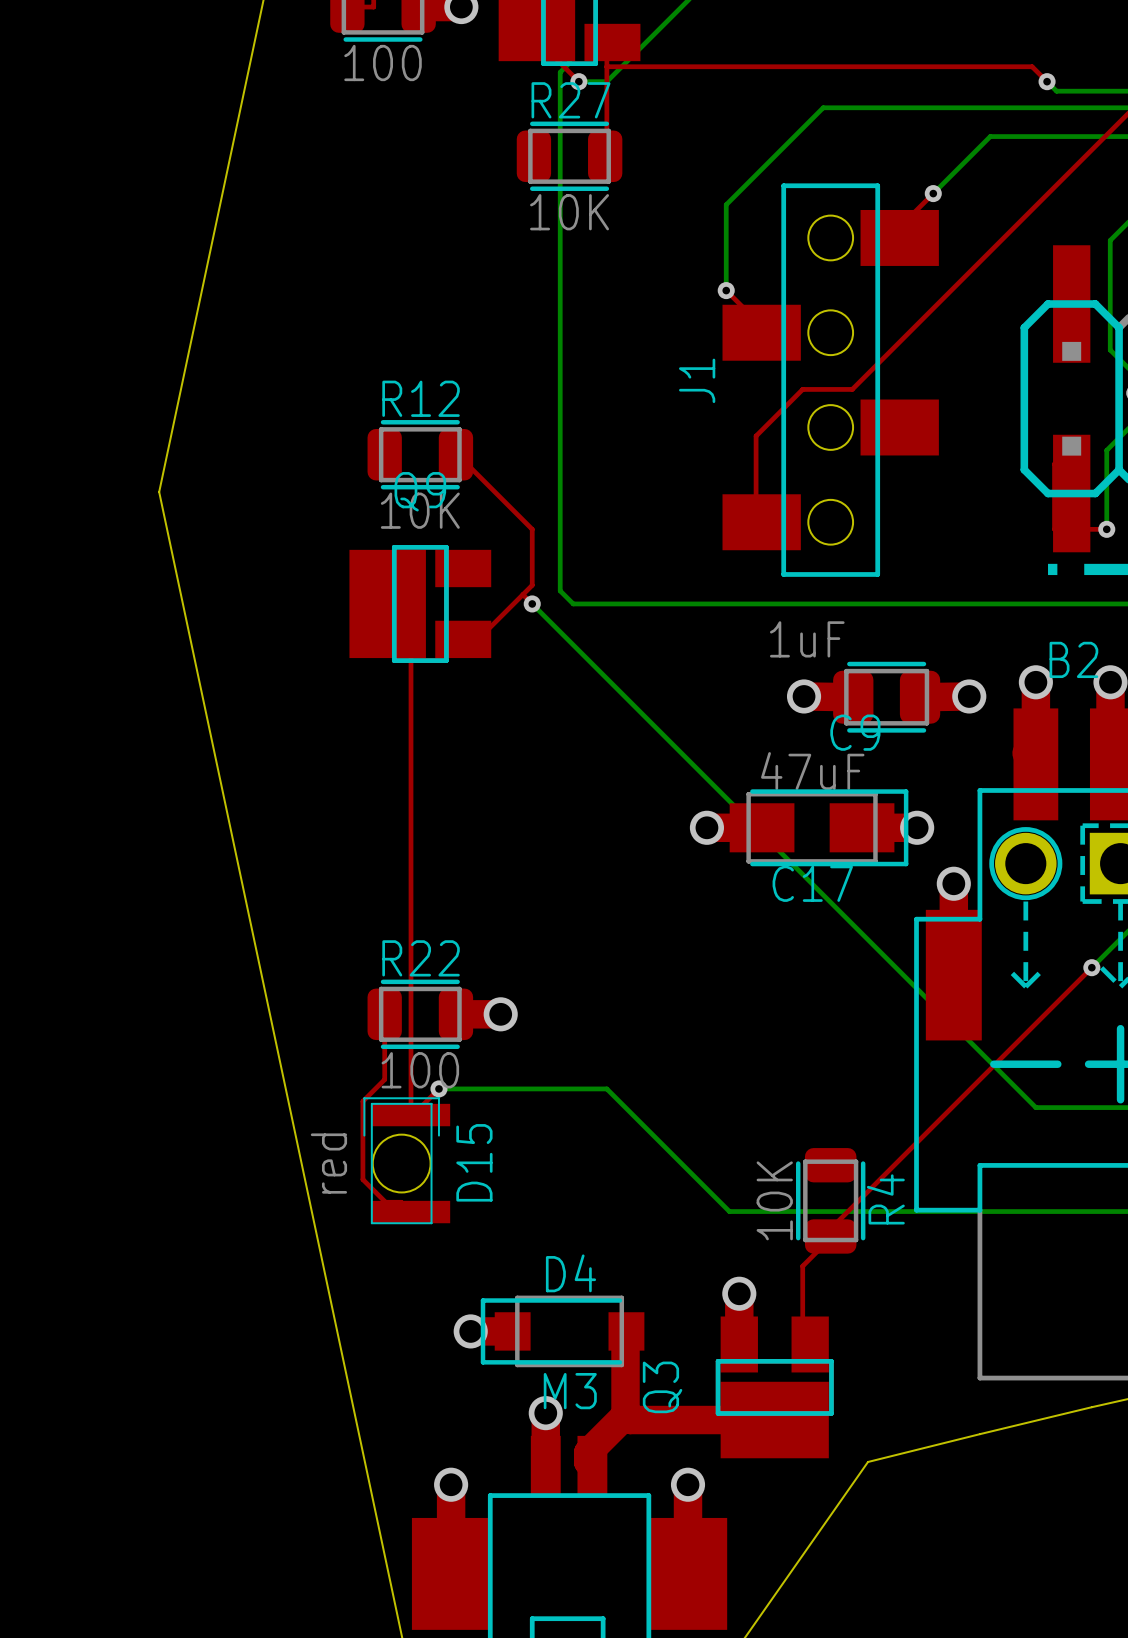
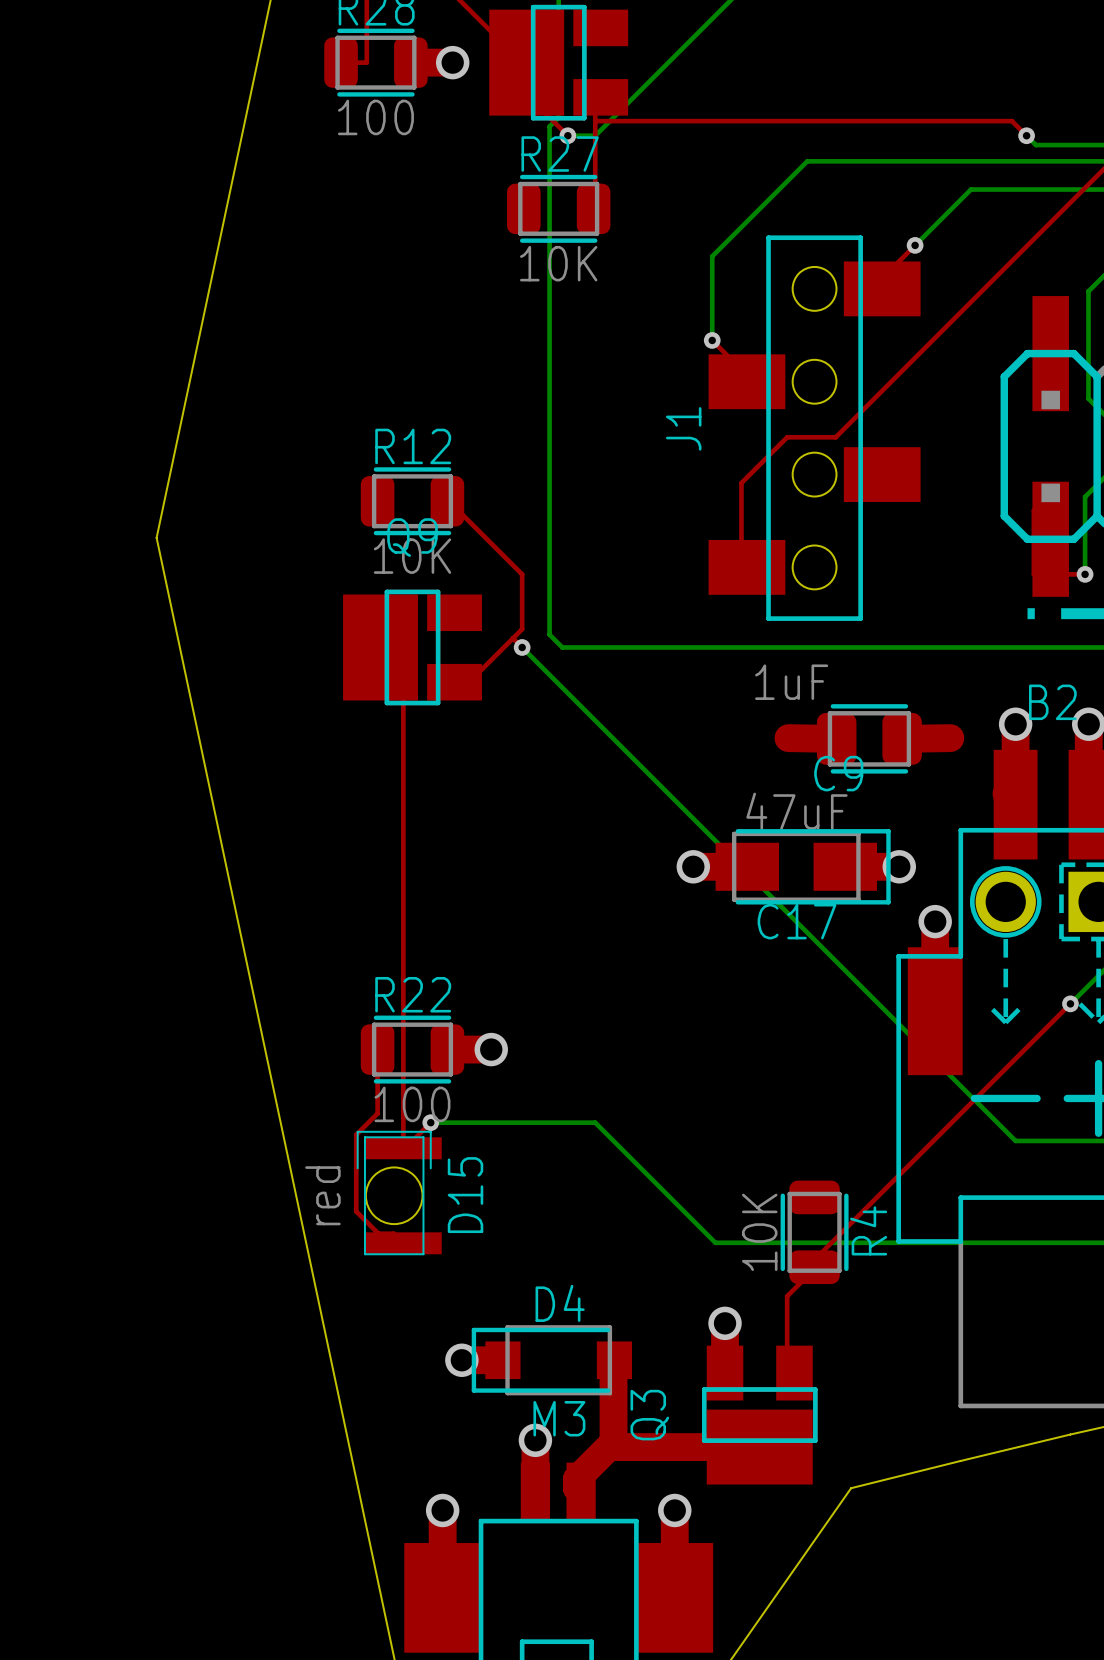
via: (804, 696) -> none
via: (969, 696) -> none

